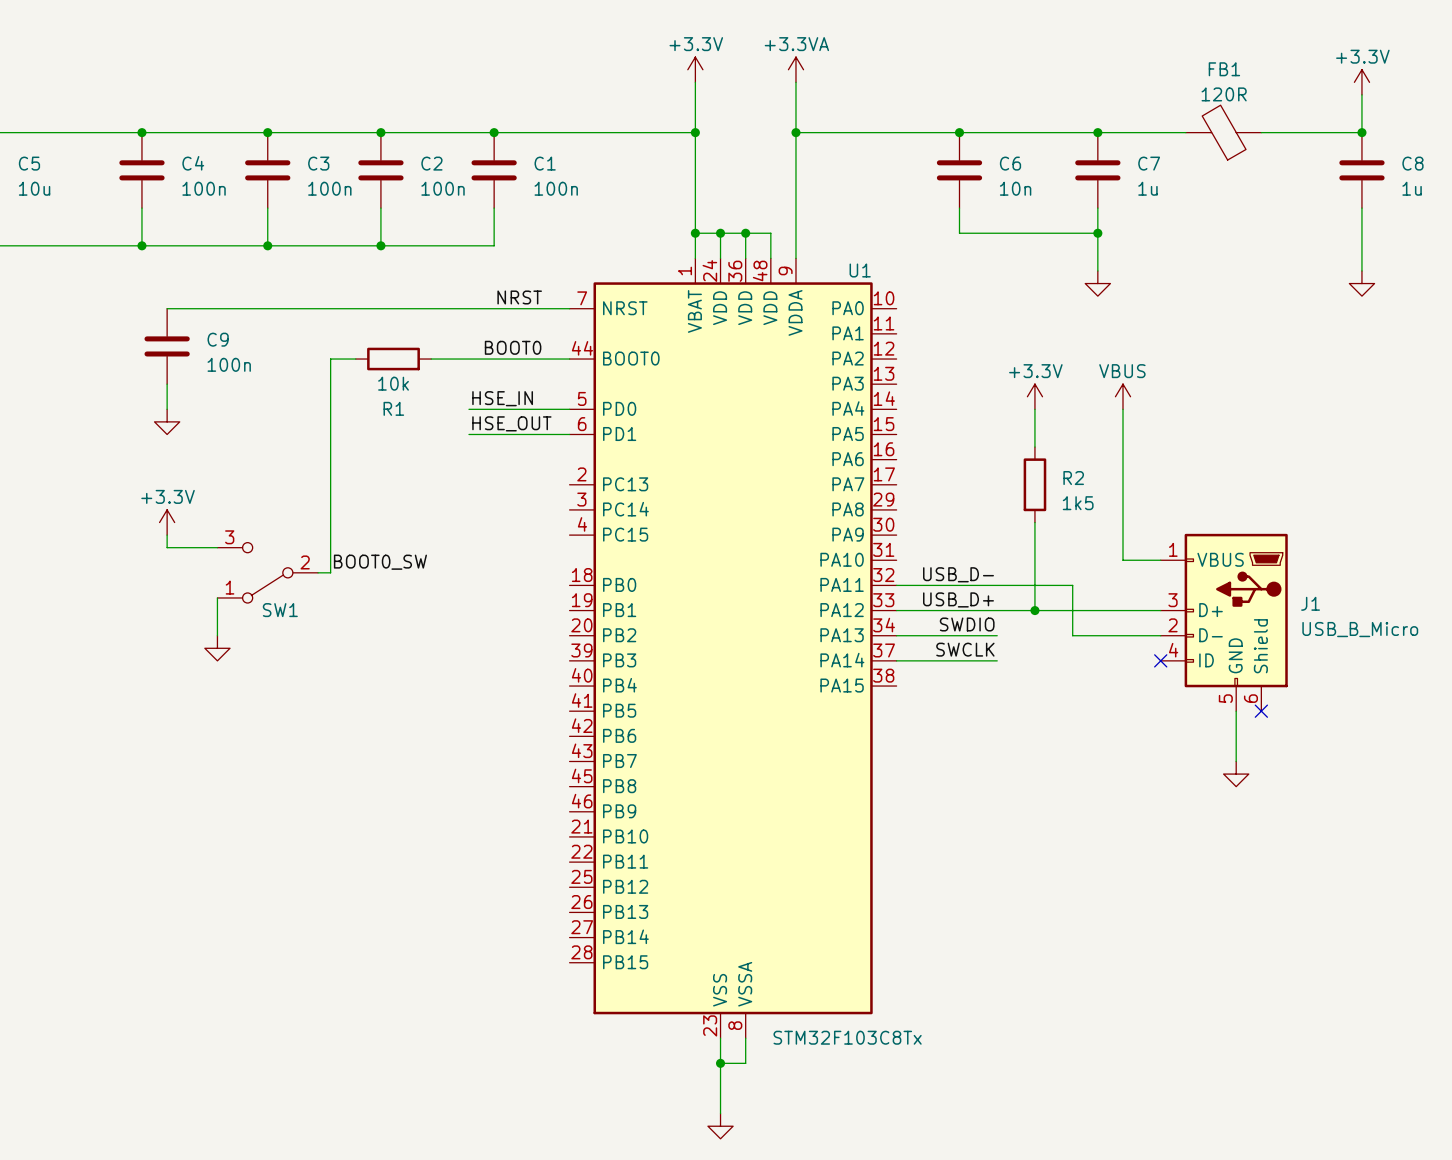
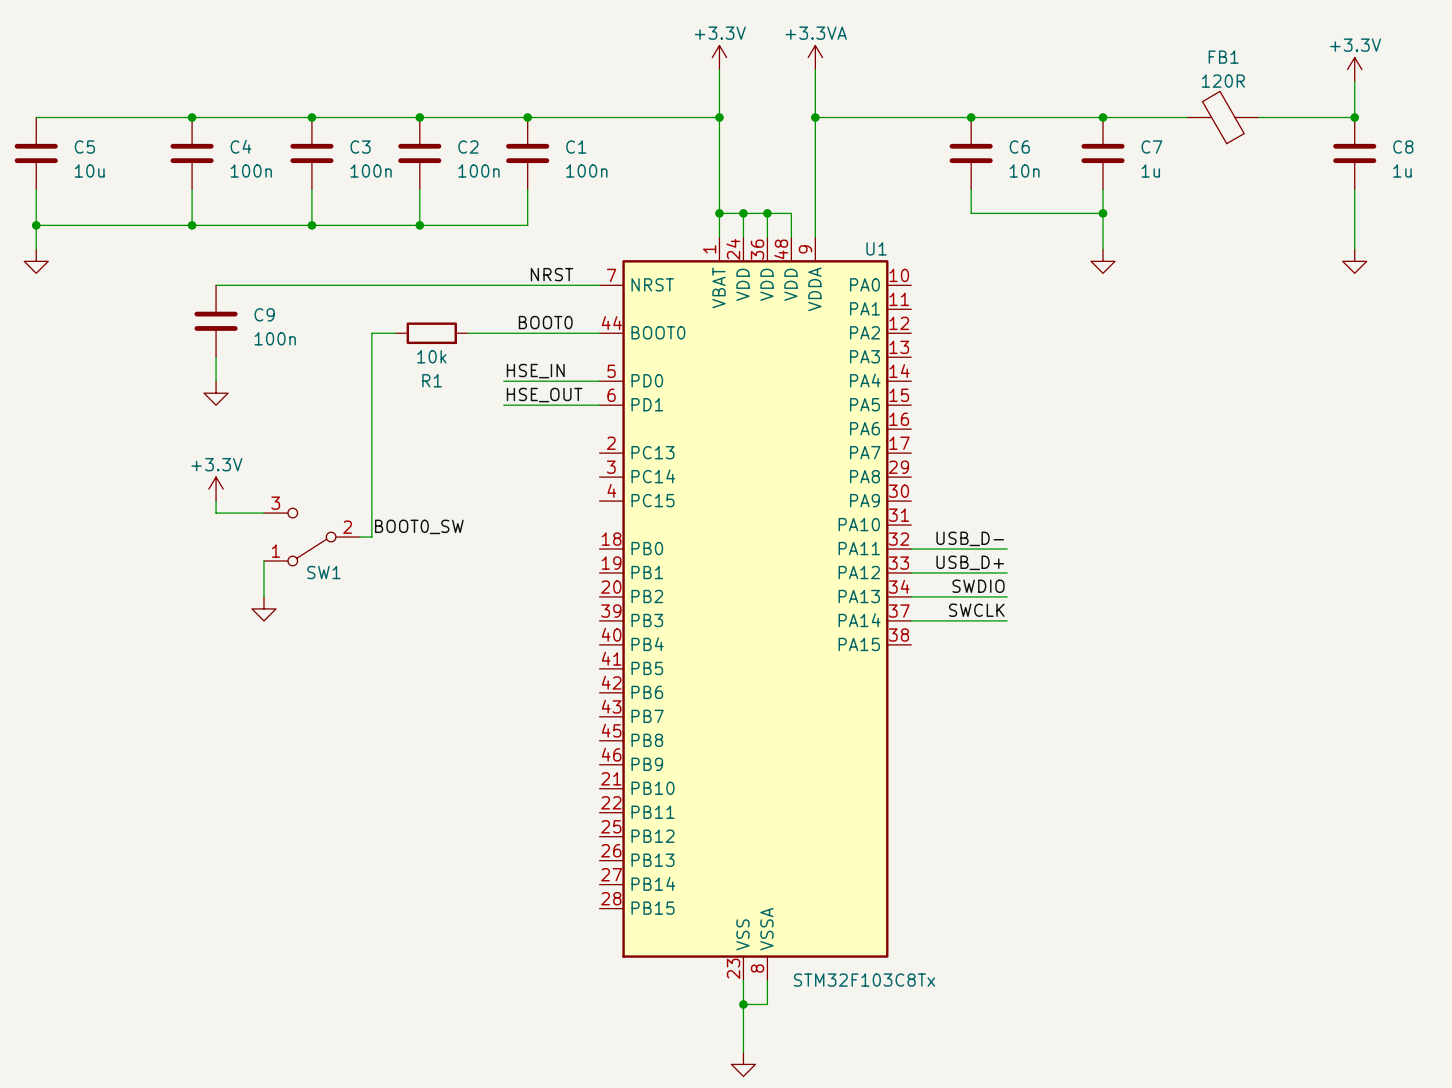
power symbol: +3.3V (1034, 396) -> none
power symbol: VBUS (1123, 396) -> none
wire: (1034, 409) (1034, 447) -> none
wire: (1123, 409) (1123, 560) (1160, 560) -> none
R2: 1k5 (1034, 484) -> none
wire: (1034, 522) (1034, 610) -> none
wire: (997, 585) (1072, 585) (1072, 635) (1160, 635) -> none
wire: (997, 610) (1160, 610) -> none
junction: (1034, 610) -> none
J1: USB_B_Micro (1224, 622) -> none
no-connect mark: (1160, 660) -> none
wire: (1236, 711) (1236, 761) -> none
no-connect mark: (1261, 711) -> none
power symbol: (1236, 774) -> none

